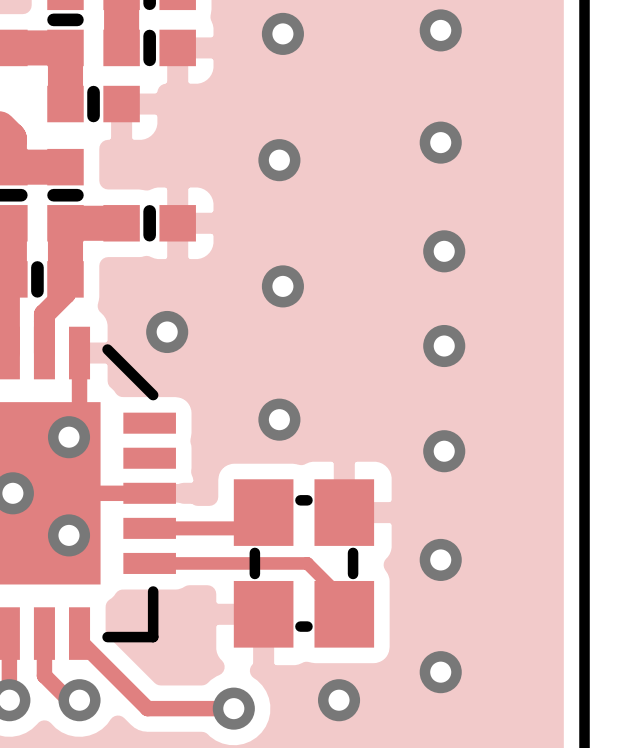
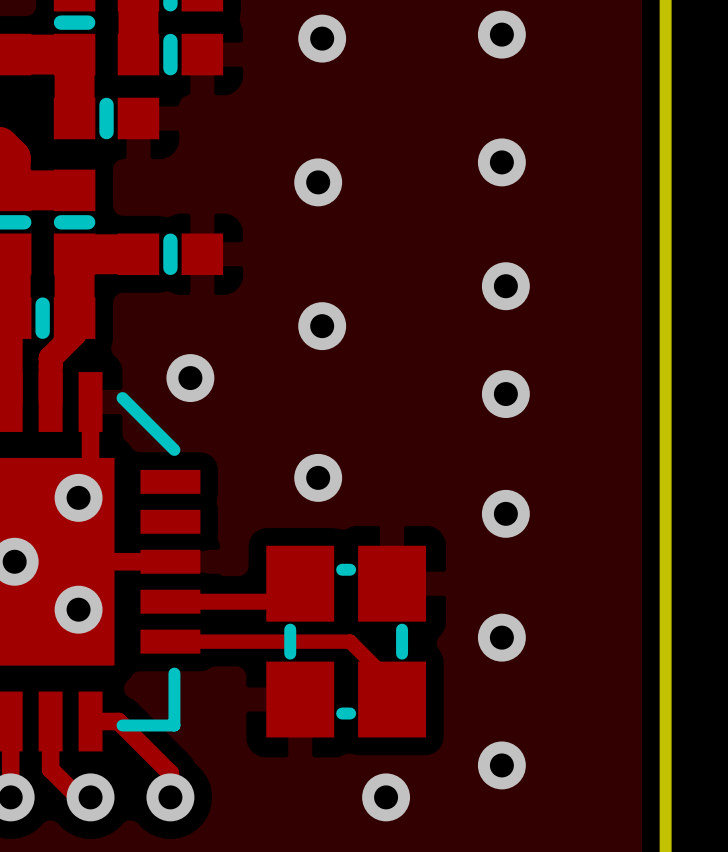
track: none -> (90, 721) (118, 721) (170, 773) (170, 797)
track: (79, 640) (147, 708) (233, 708) -> none
via: none -> (170, 797)
via: (233, 708) -> none

